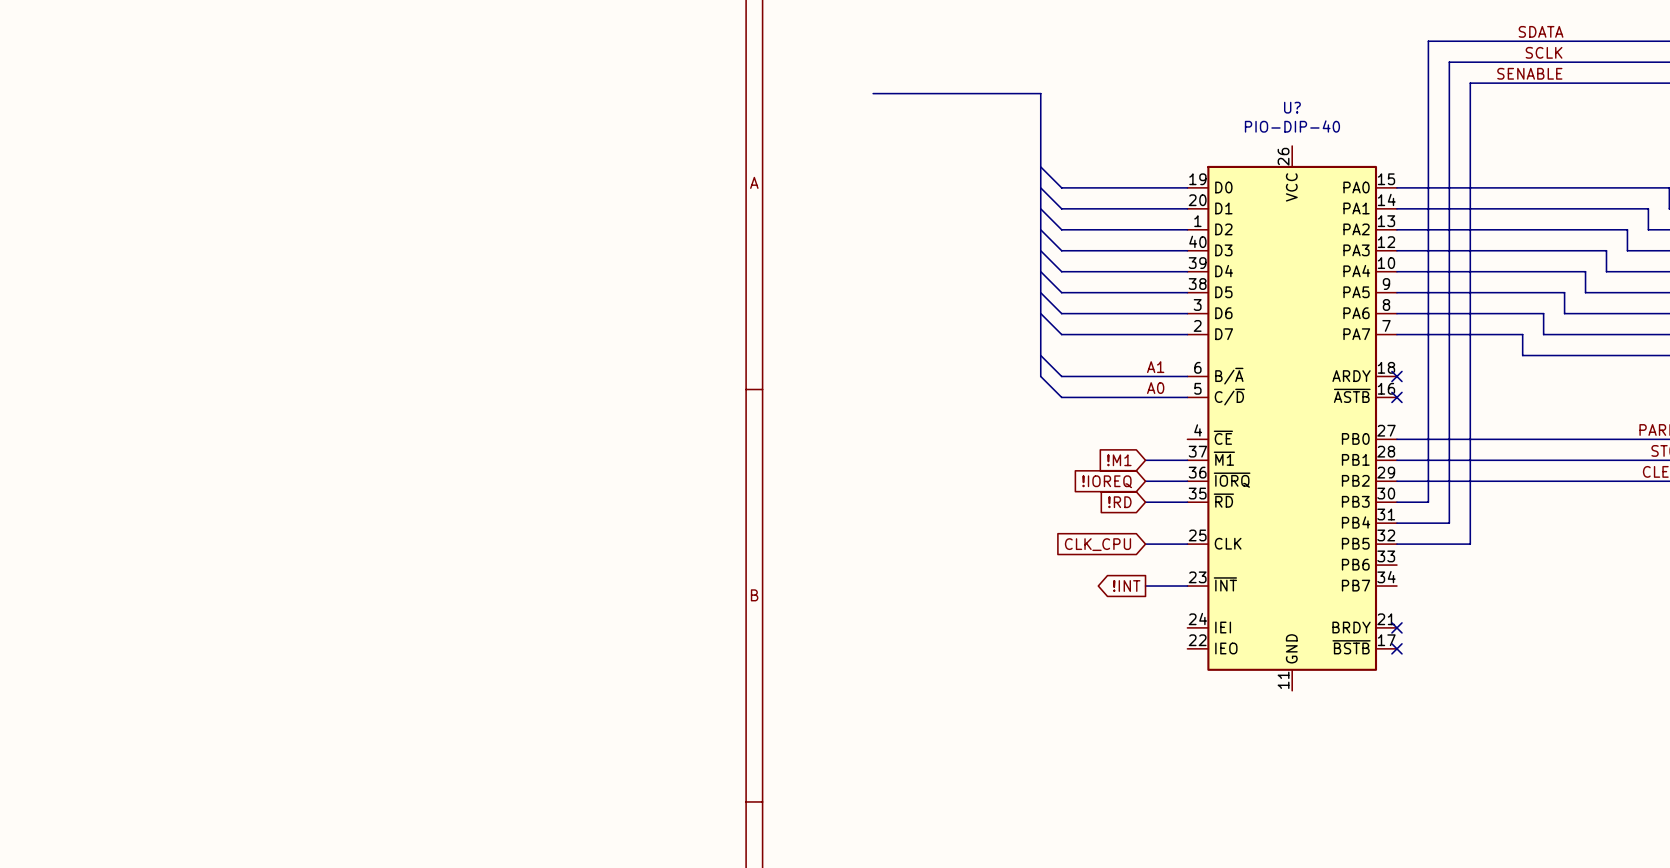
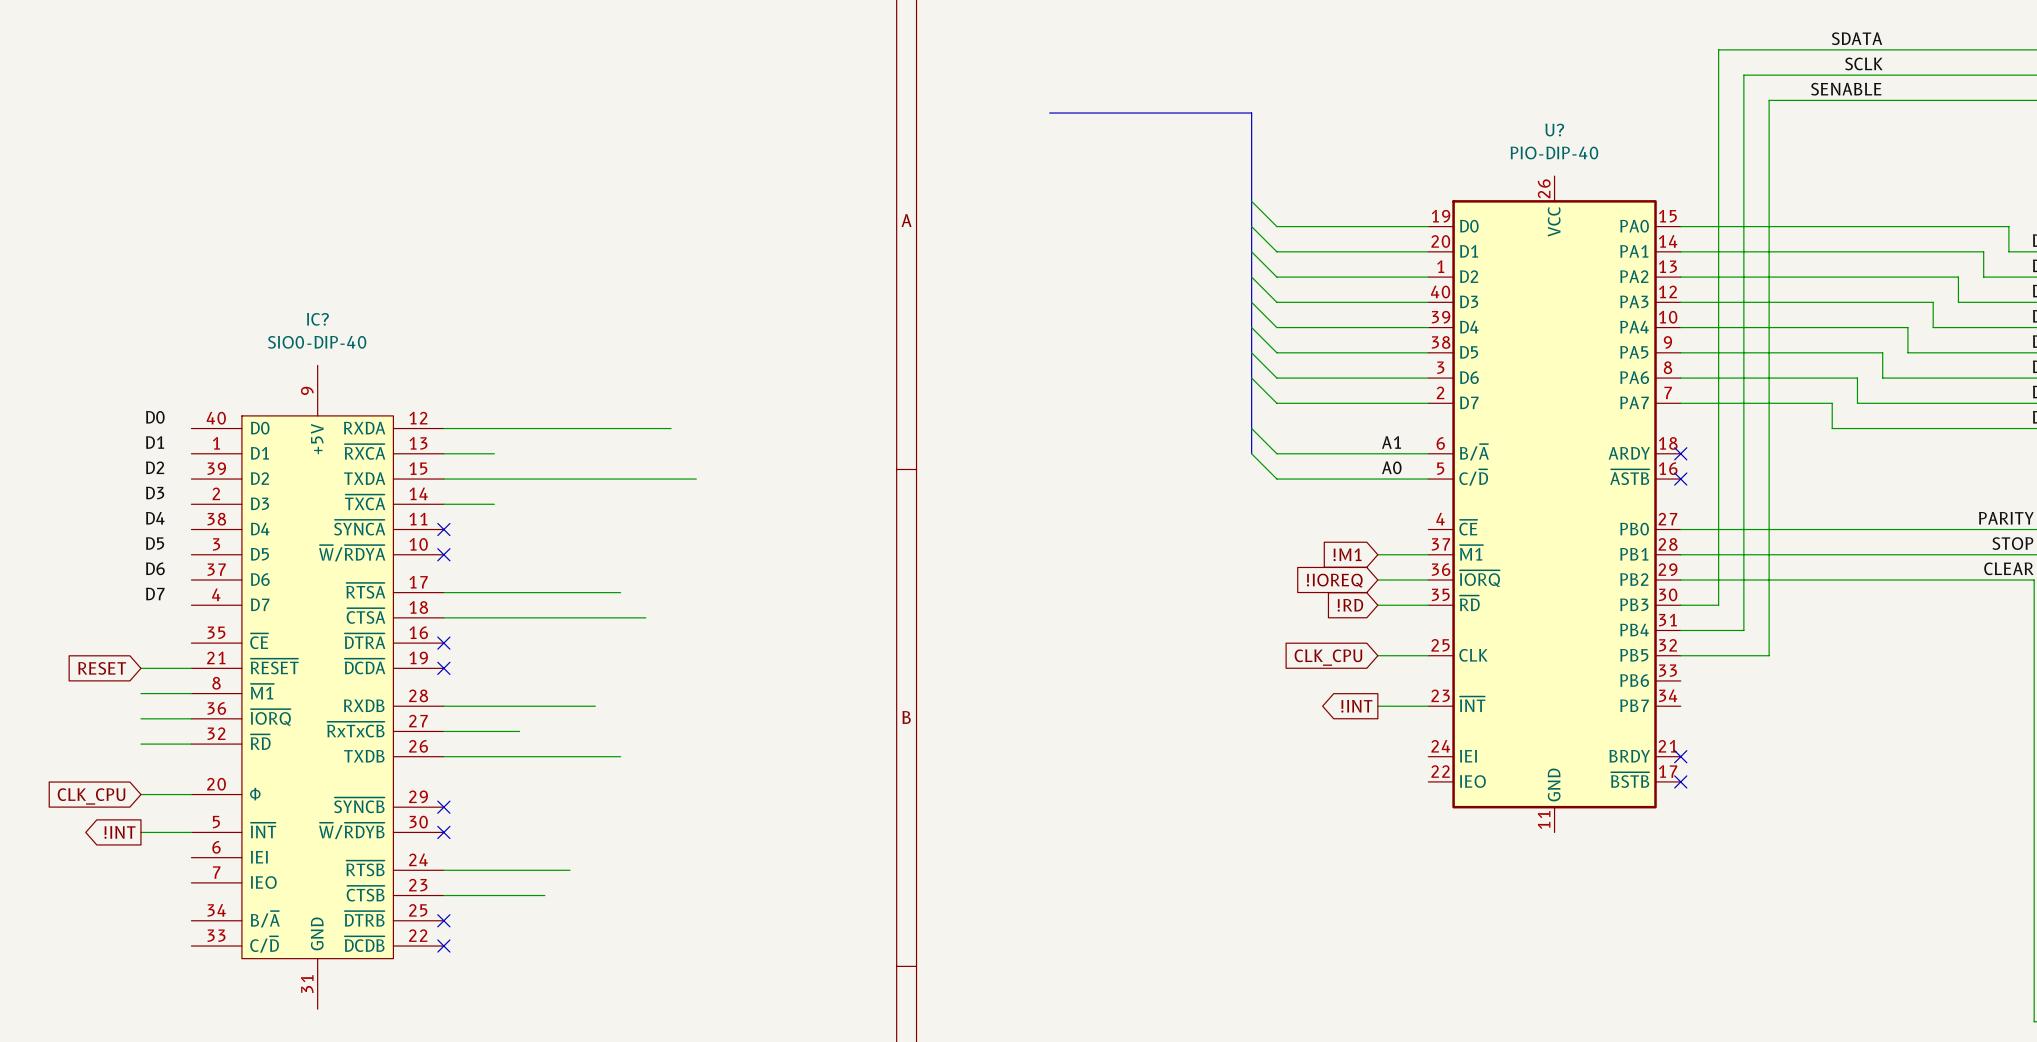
label: none -> D0 (155, 417)
wire: none -> (443, 428) (671, 428)
label: none -> D1 (155, 442)
wire: none -> (443, 453) (494, 453)
label: none -> D2 (155, 467)
wire: none -> (443, 479) (696, 479)
label: none -> D3 (155, 493)
wire: none -> (443, 504) (494, 504)
label: none -> D4 (155, 518)
no-connect mark: none -> (443, 529)
label: none -> D5 (155, 543)
no-connect mark: none -> (443, 554)
label: none -> D6 (155, 568)
wire: none -> (443, 592) (620, 592)
label: none -> D7 (155, 594)
wire: none -> (443, 617) (645, 617)
no-connect mark: none -> (443, 643)
global label: none -> RESET (102, 668)
wire: none -> (140, 668) (191, 668)
no-connect mark: none -> (443, 668)
IC?: none -> SIO0-DIP-40 (317, 687)
wire: none -> (140, 693) (191, 693)
wire: none -> (443, 706) (595, 706)
wire: none -> (140, 718) (191, 718)
wire: none -> (443, 731) (519, 731)
wire: none -> (140, 744) (191, 744)
wire: none -> (443, 756) (620, 756)
global label: none -> CLK_CPU (91, 796)
wire: none -> (140, 794) (191, 794)
no-connect mark: none -> (443, 807)
global label: none -> !INT (119, 832)
wire: none -> (140, 832) (191, 832)
no-connect mark: none -> (443, 832)
wire: none -> (443, 870) (570, 870)
wire: none -> (443, 895) (544, 895)
no-connect mark: none -> (443, 920)
no-connect mark: none -> (443, 946)

